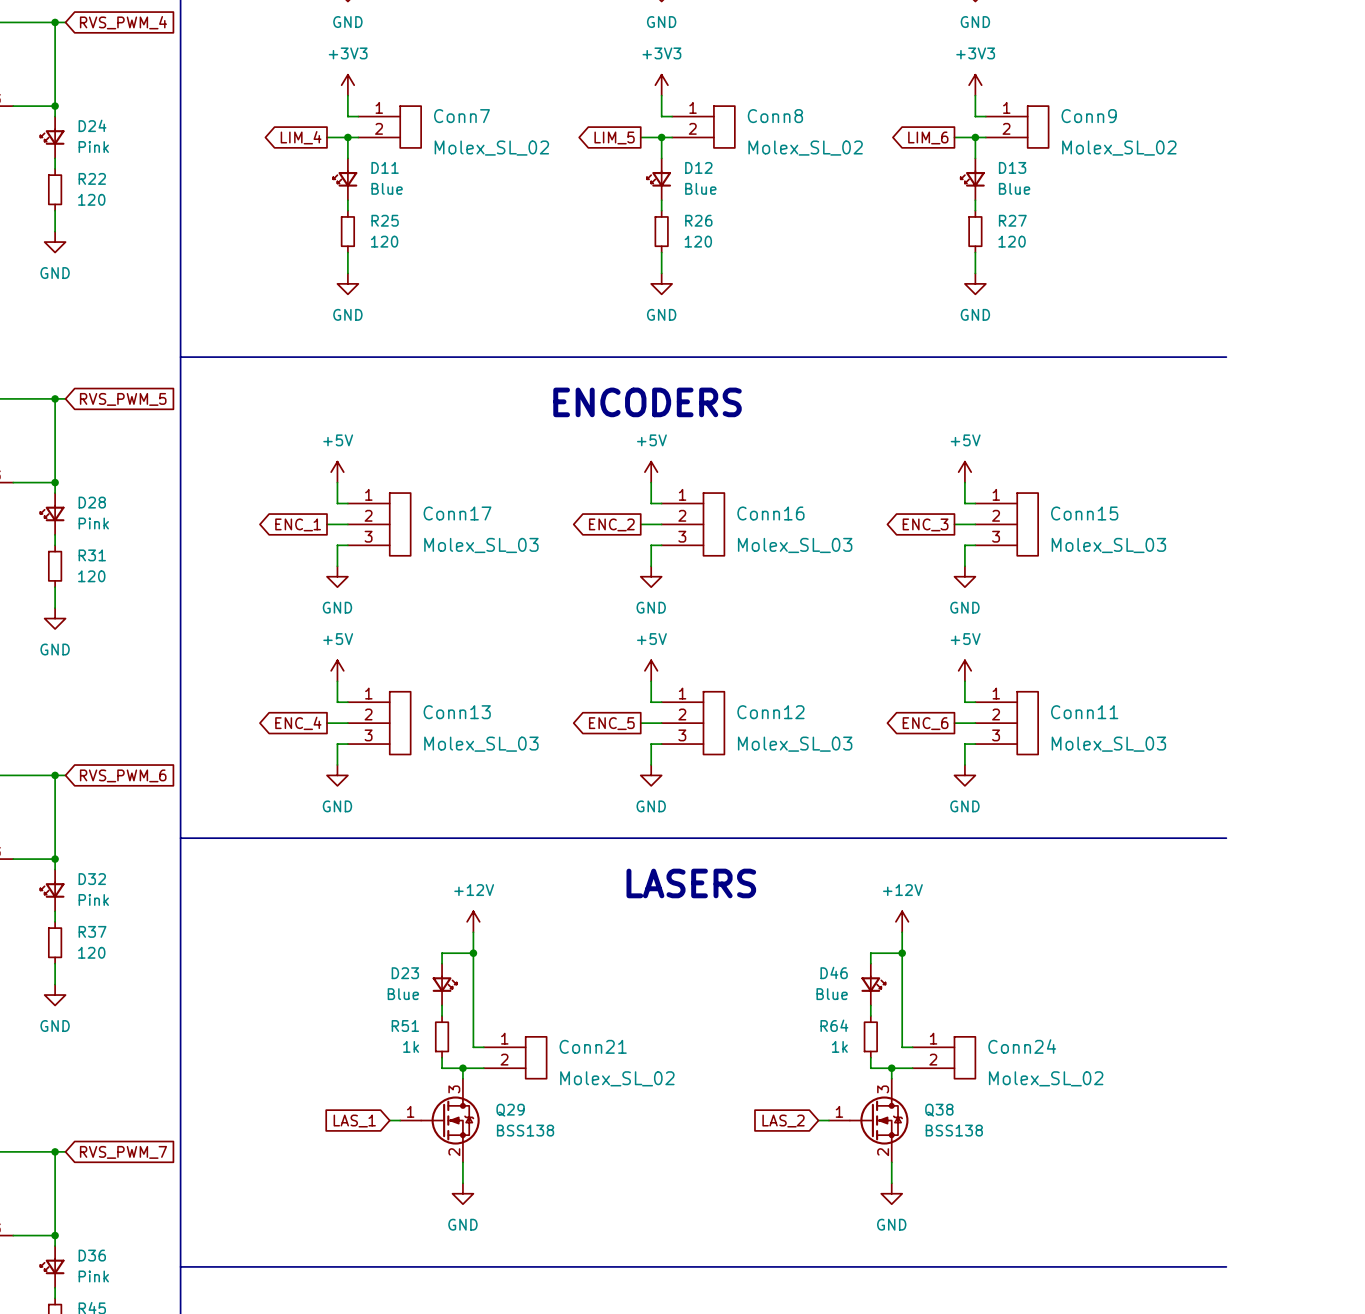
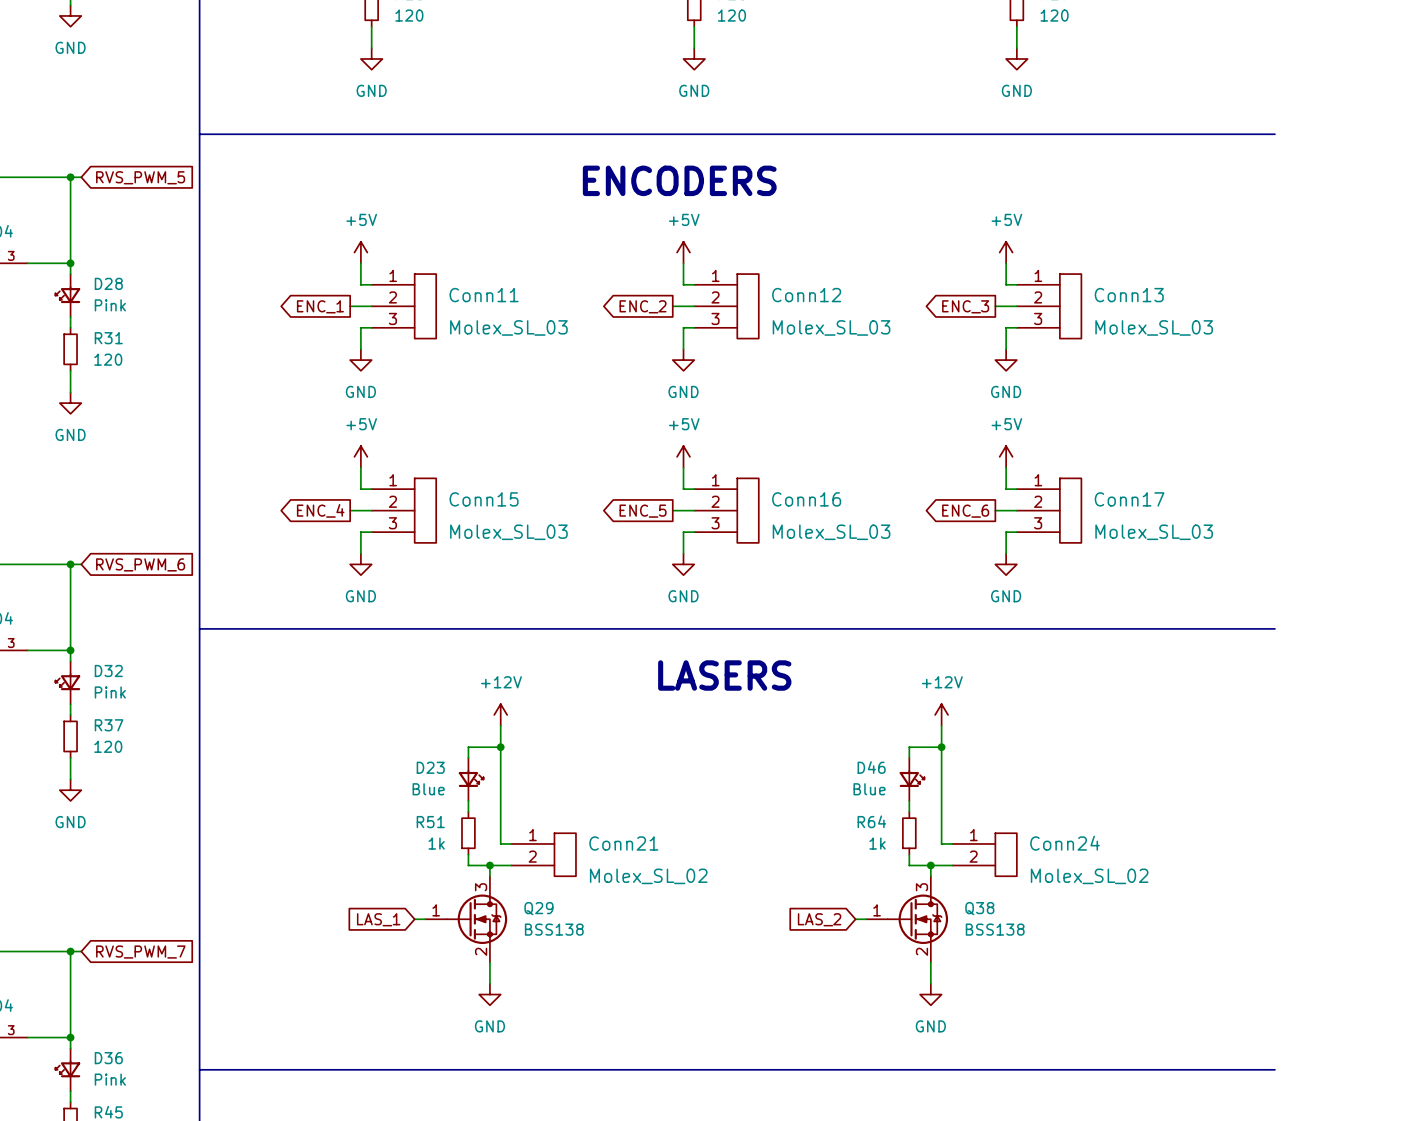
Conn17 name: Conn17 (457, 513) -> Conn11 (484, 295)
Conn16 name: Conn16 (770, 513) -> Conn12 (806, 295)
Conn15 name: Conn15 (1084, 513) -> Conn13 (1129, 295)
Conn13 name: Conn13 (457, 712) -> Conn15 (484, 499)
Conn12 name: Conn12 (770, 712) -> Conn16 (806, 499)
Conn11 name: Conn11 (1084, 712) -> Conn17 (1129, 499)

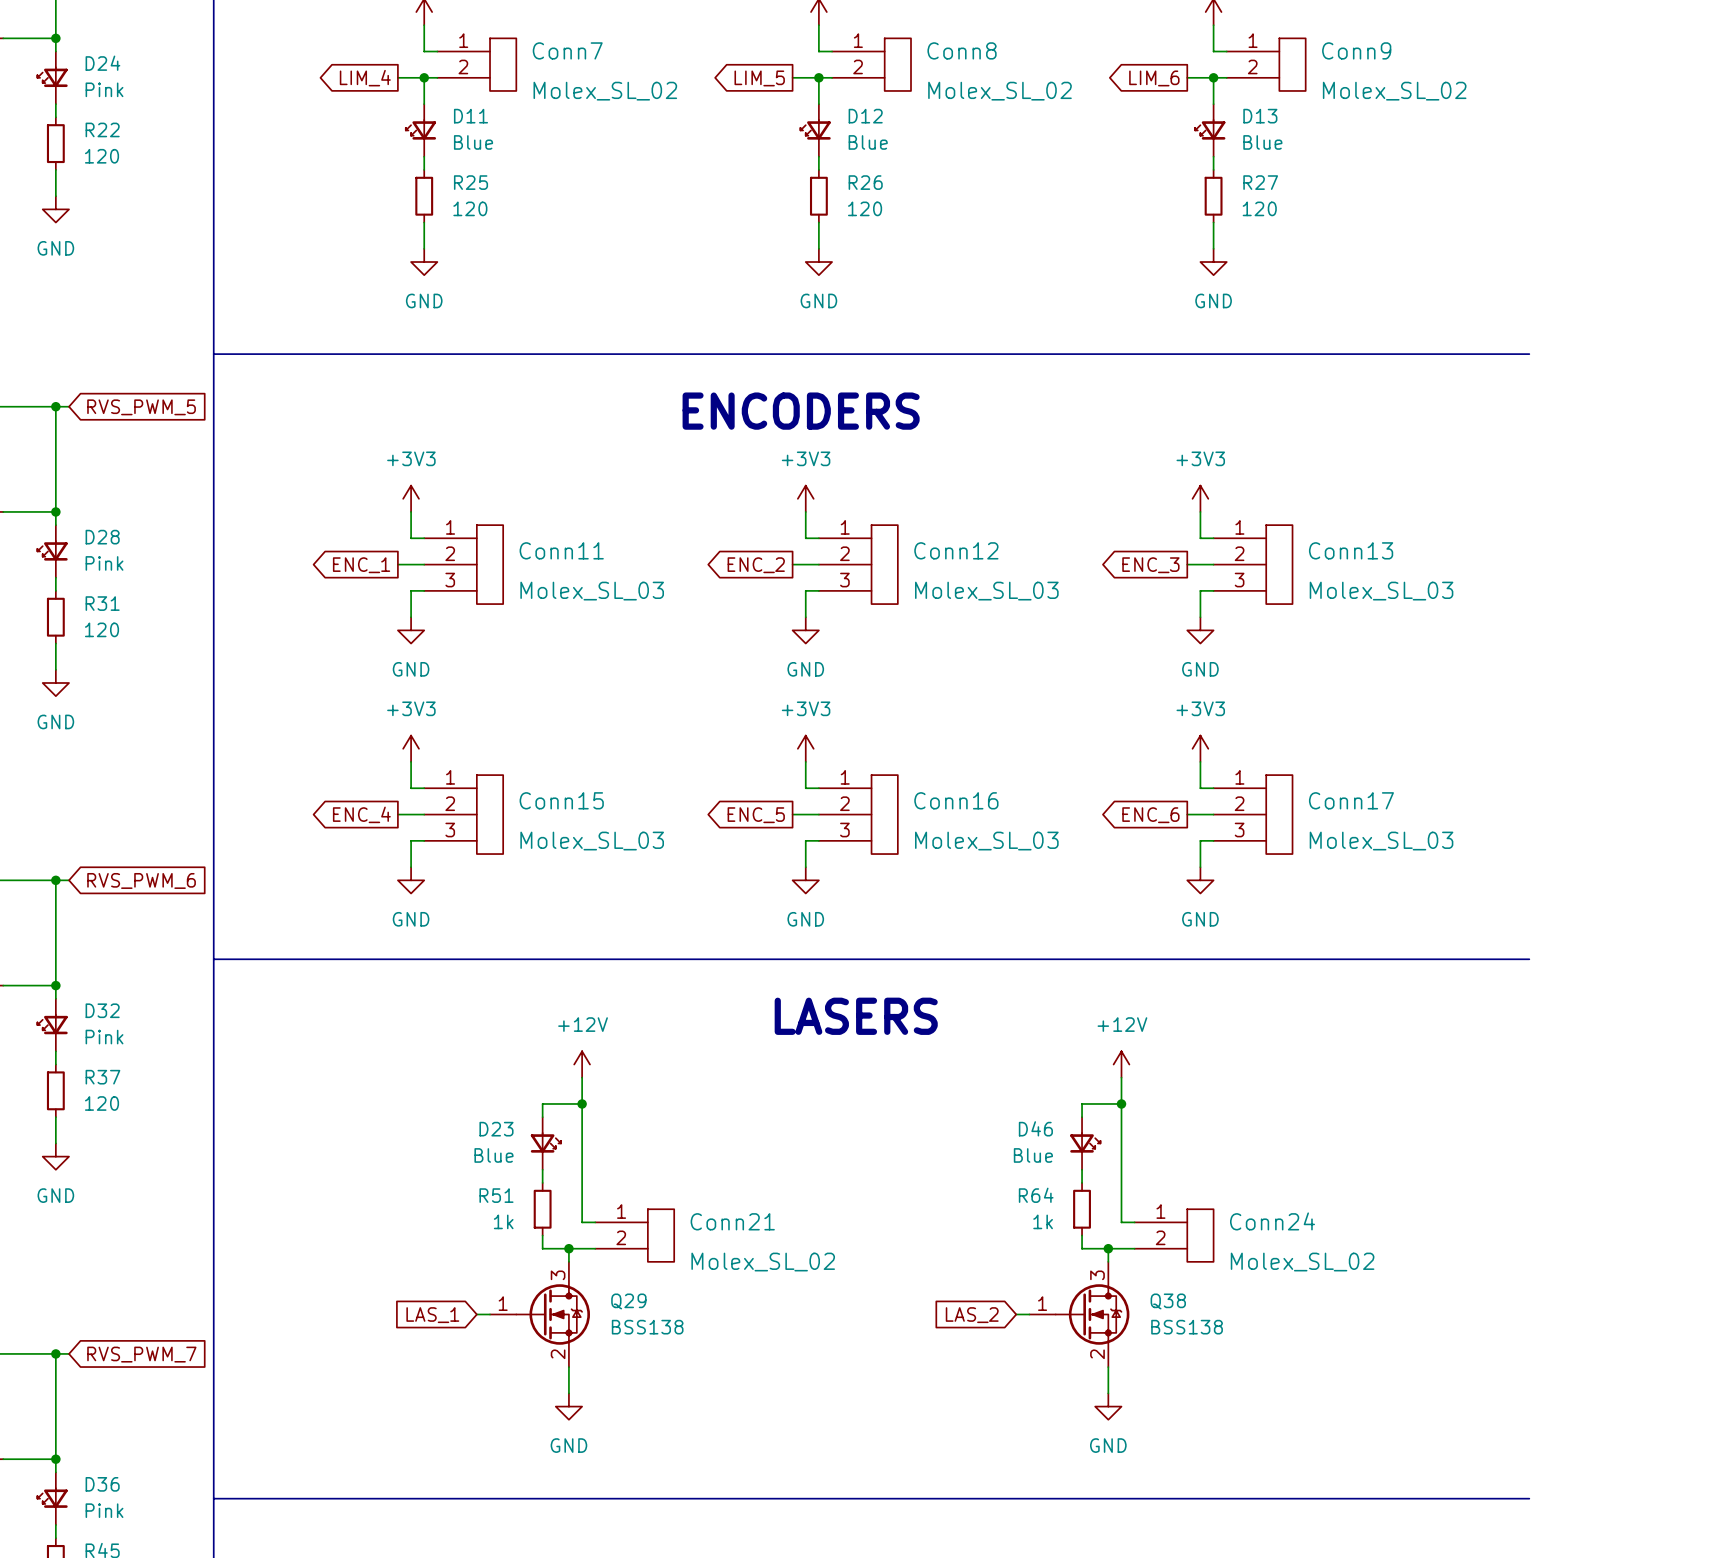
power symbol: +5V (360, 252) -> +3V3 (411, 498)
power symbol: +5V (683, 252) -> +3V3 (805, 498)
power symbol: +5V (1006, 252) -> +3V3 (1200, 498)
power symbol: +5V (360, 456) -> +3V3 (411, 748)
power symbol: +5V (683, 456) -> +3V3 (805, 748)
power symbol: +5V (1006, 456) -> +3V3 (1200, 748)

